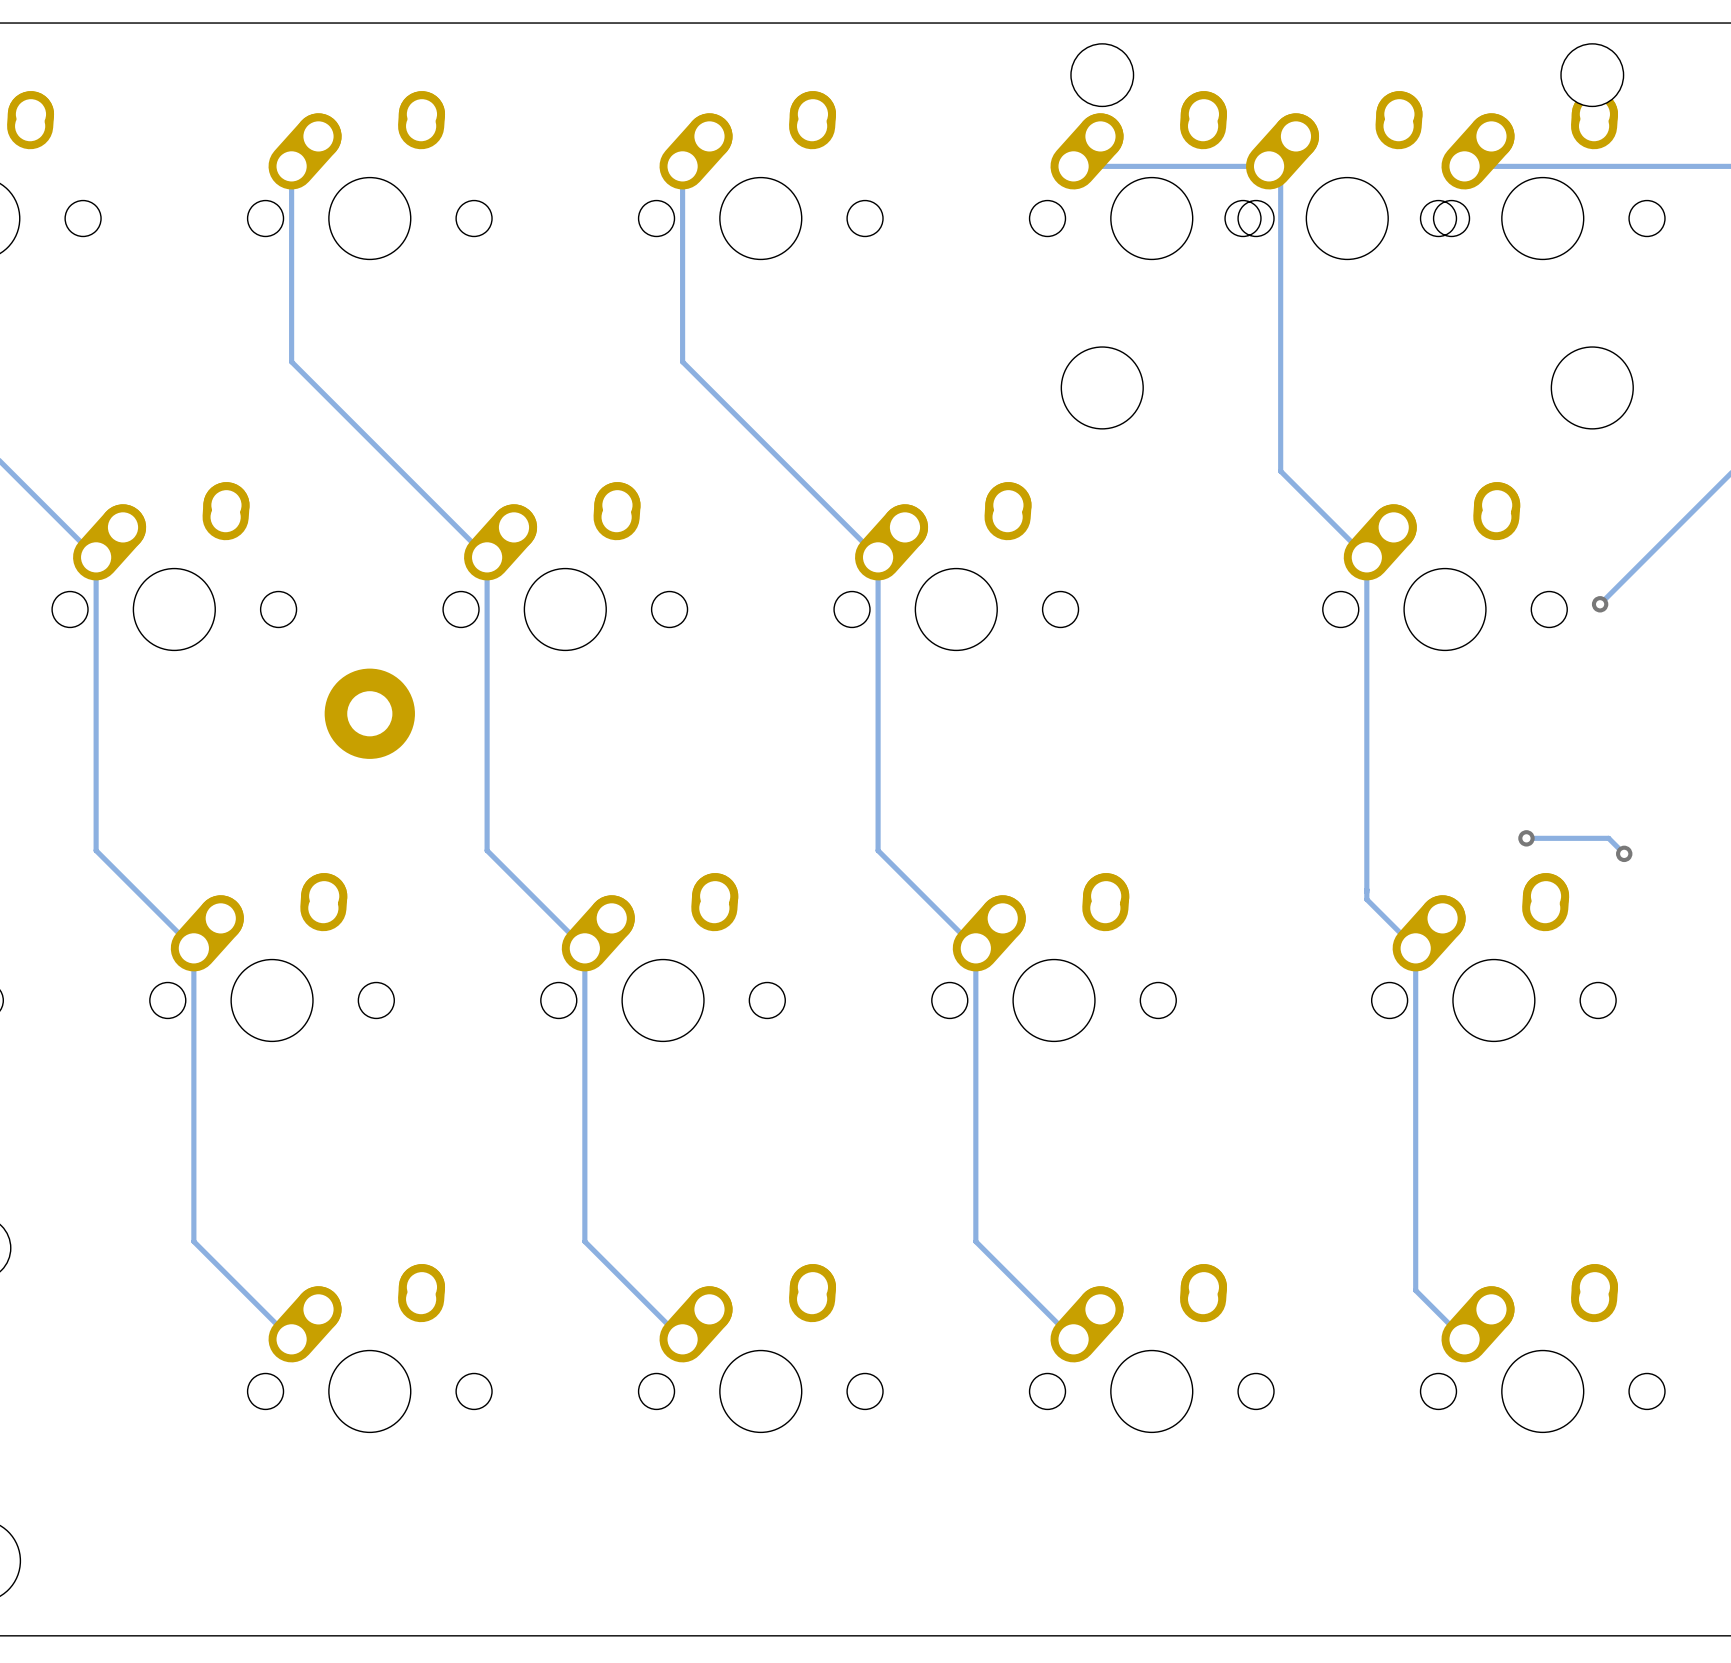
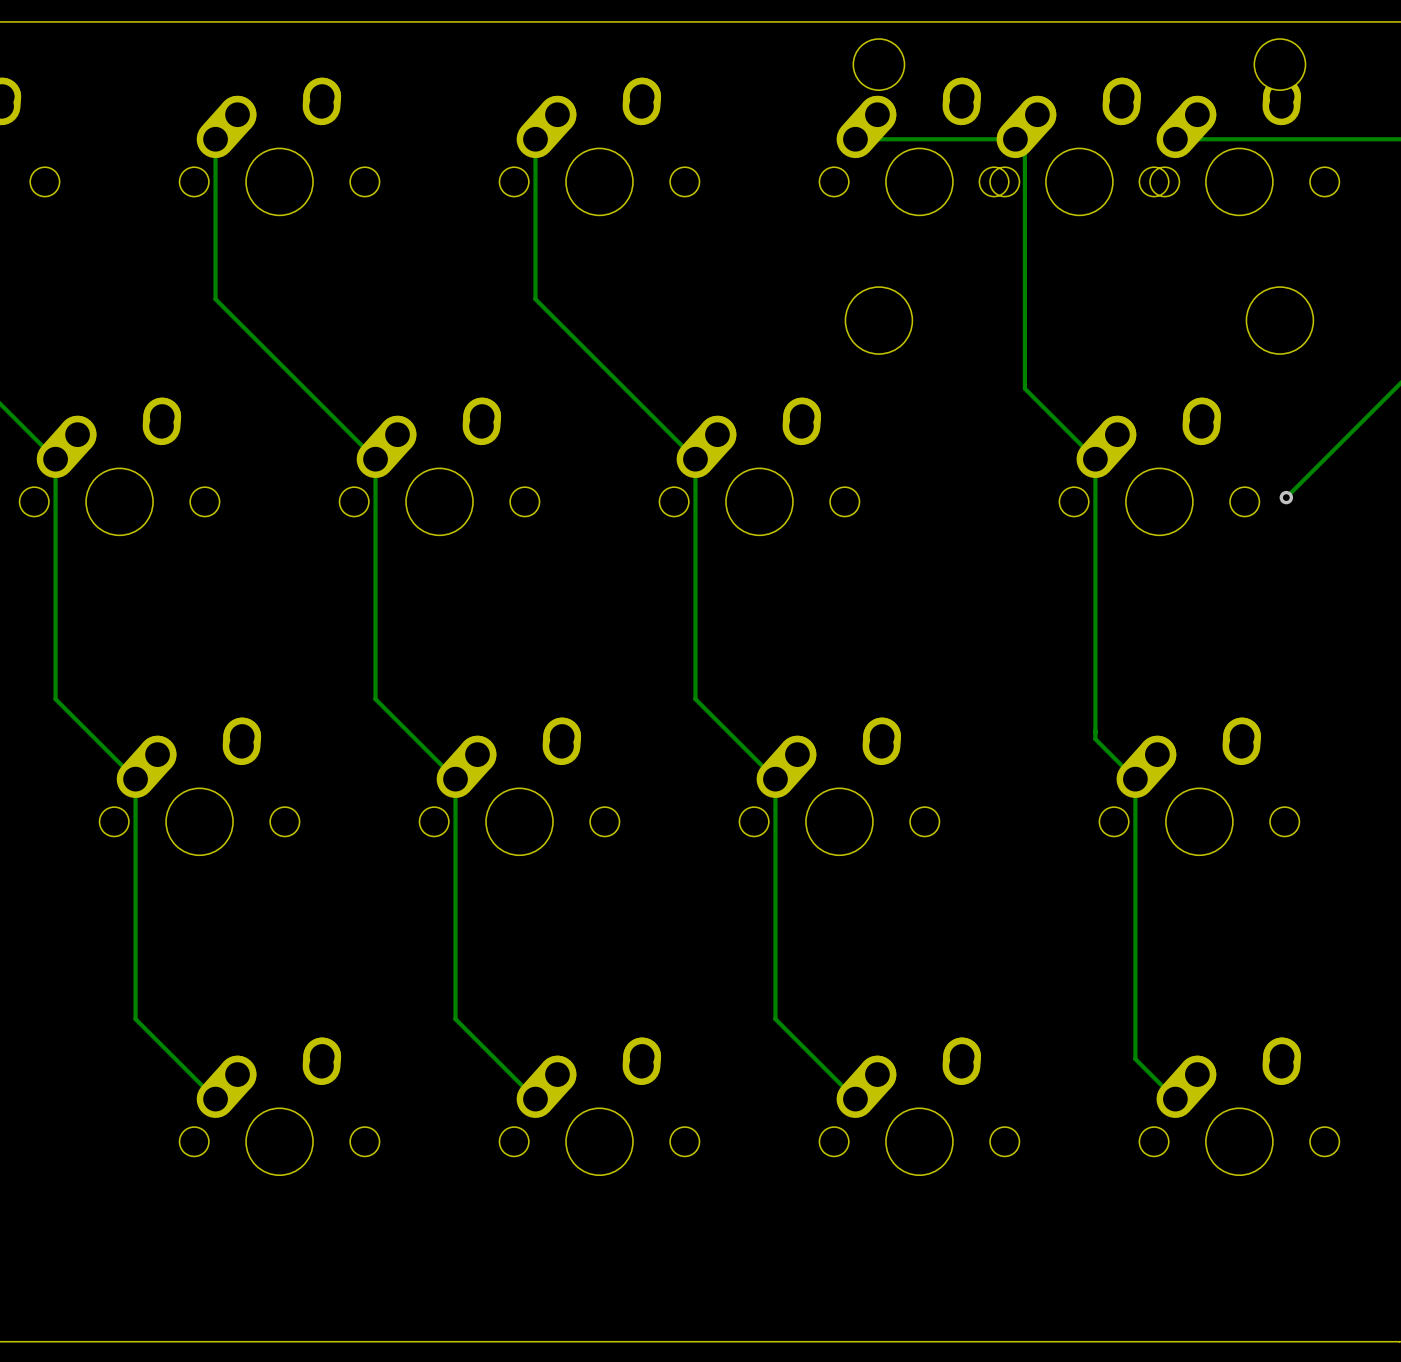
part: (369, 713) -> none
track: (1526, 838) (1608, 838) (1624, 853) -> none
via: (1526, 838) -> none
via: (1624, 853) -> none

